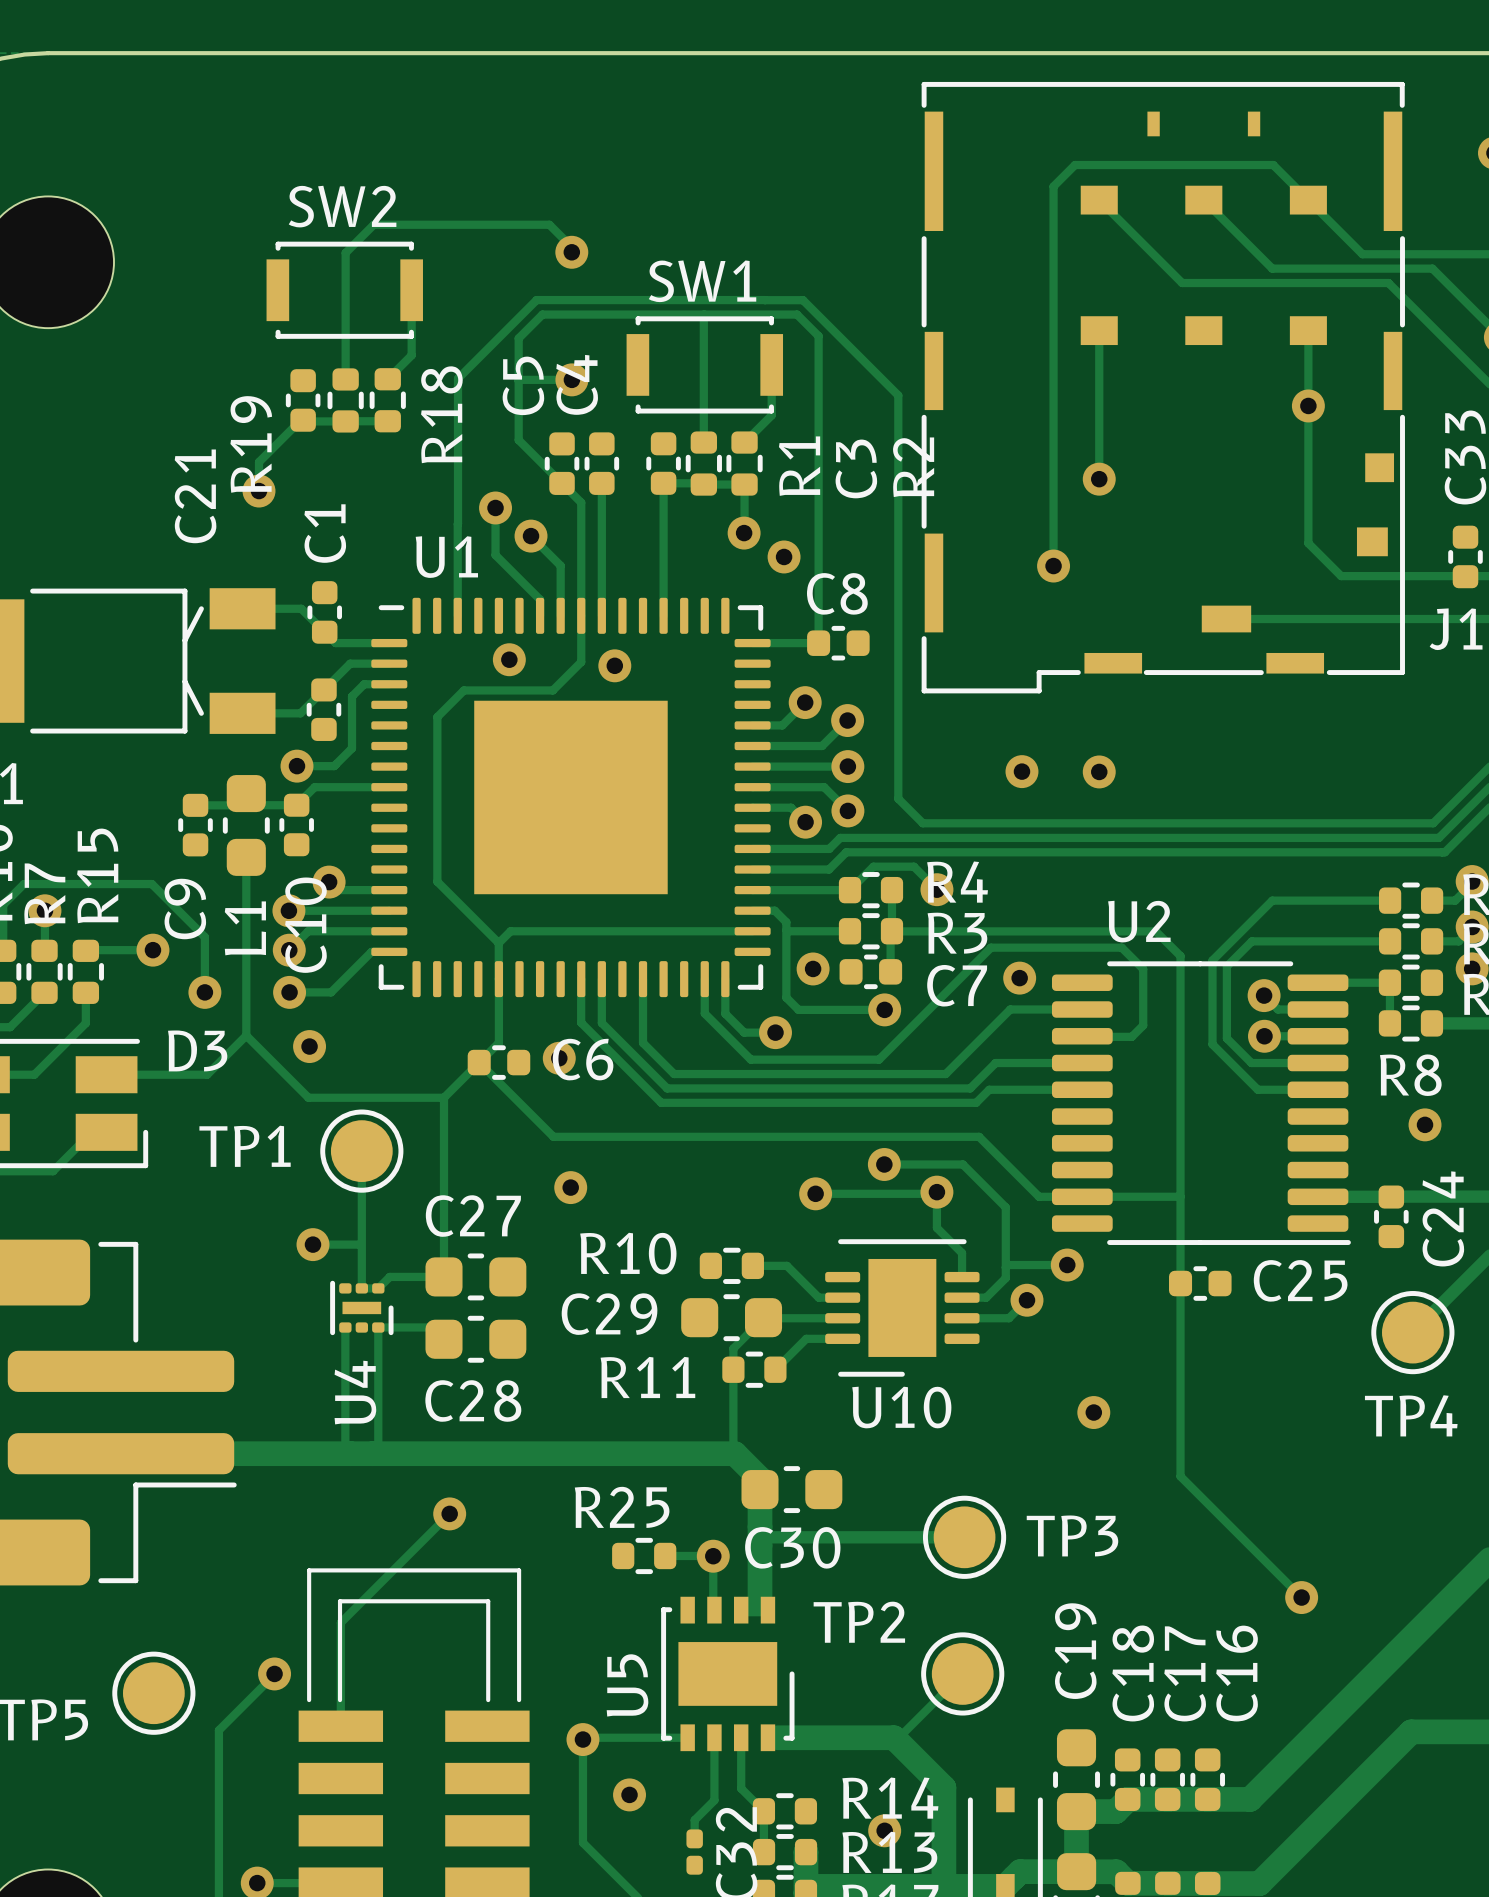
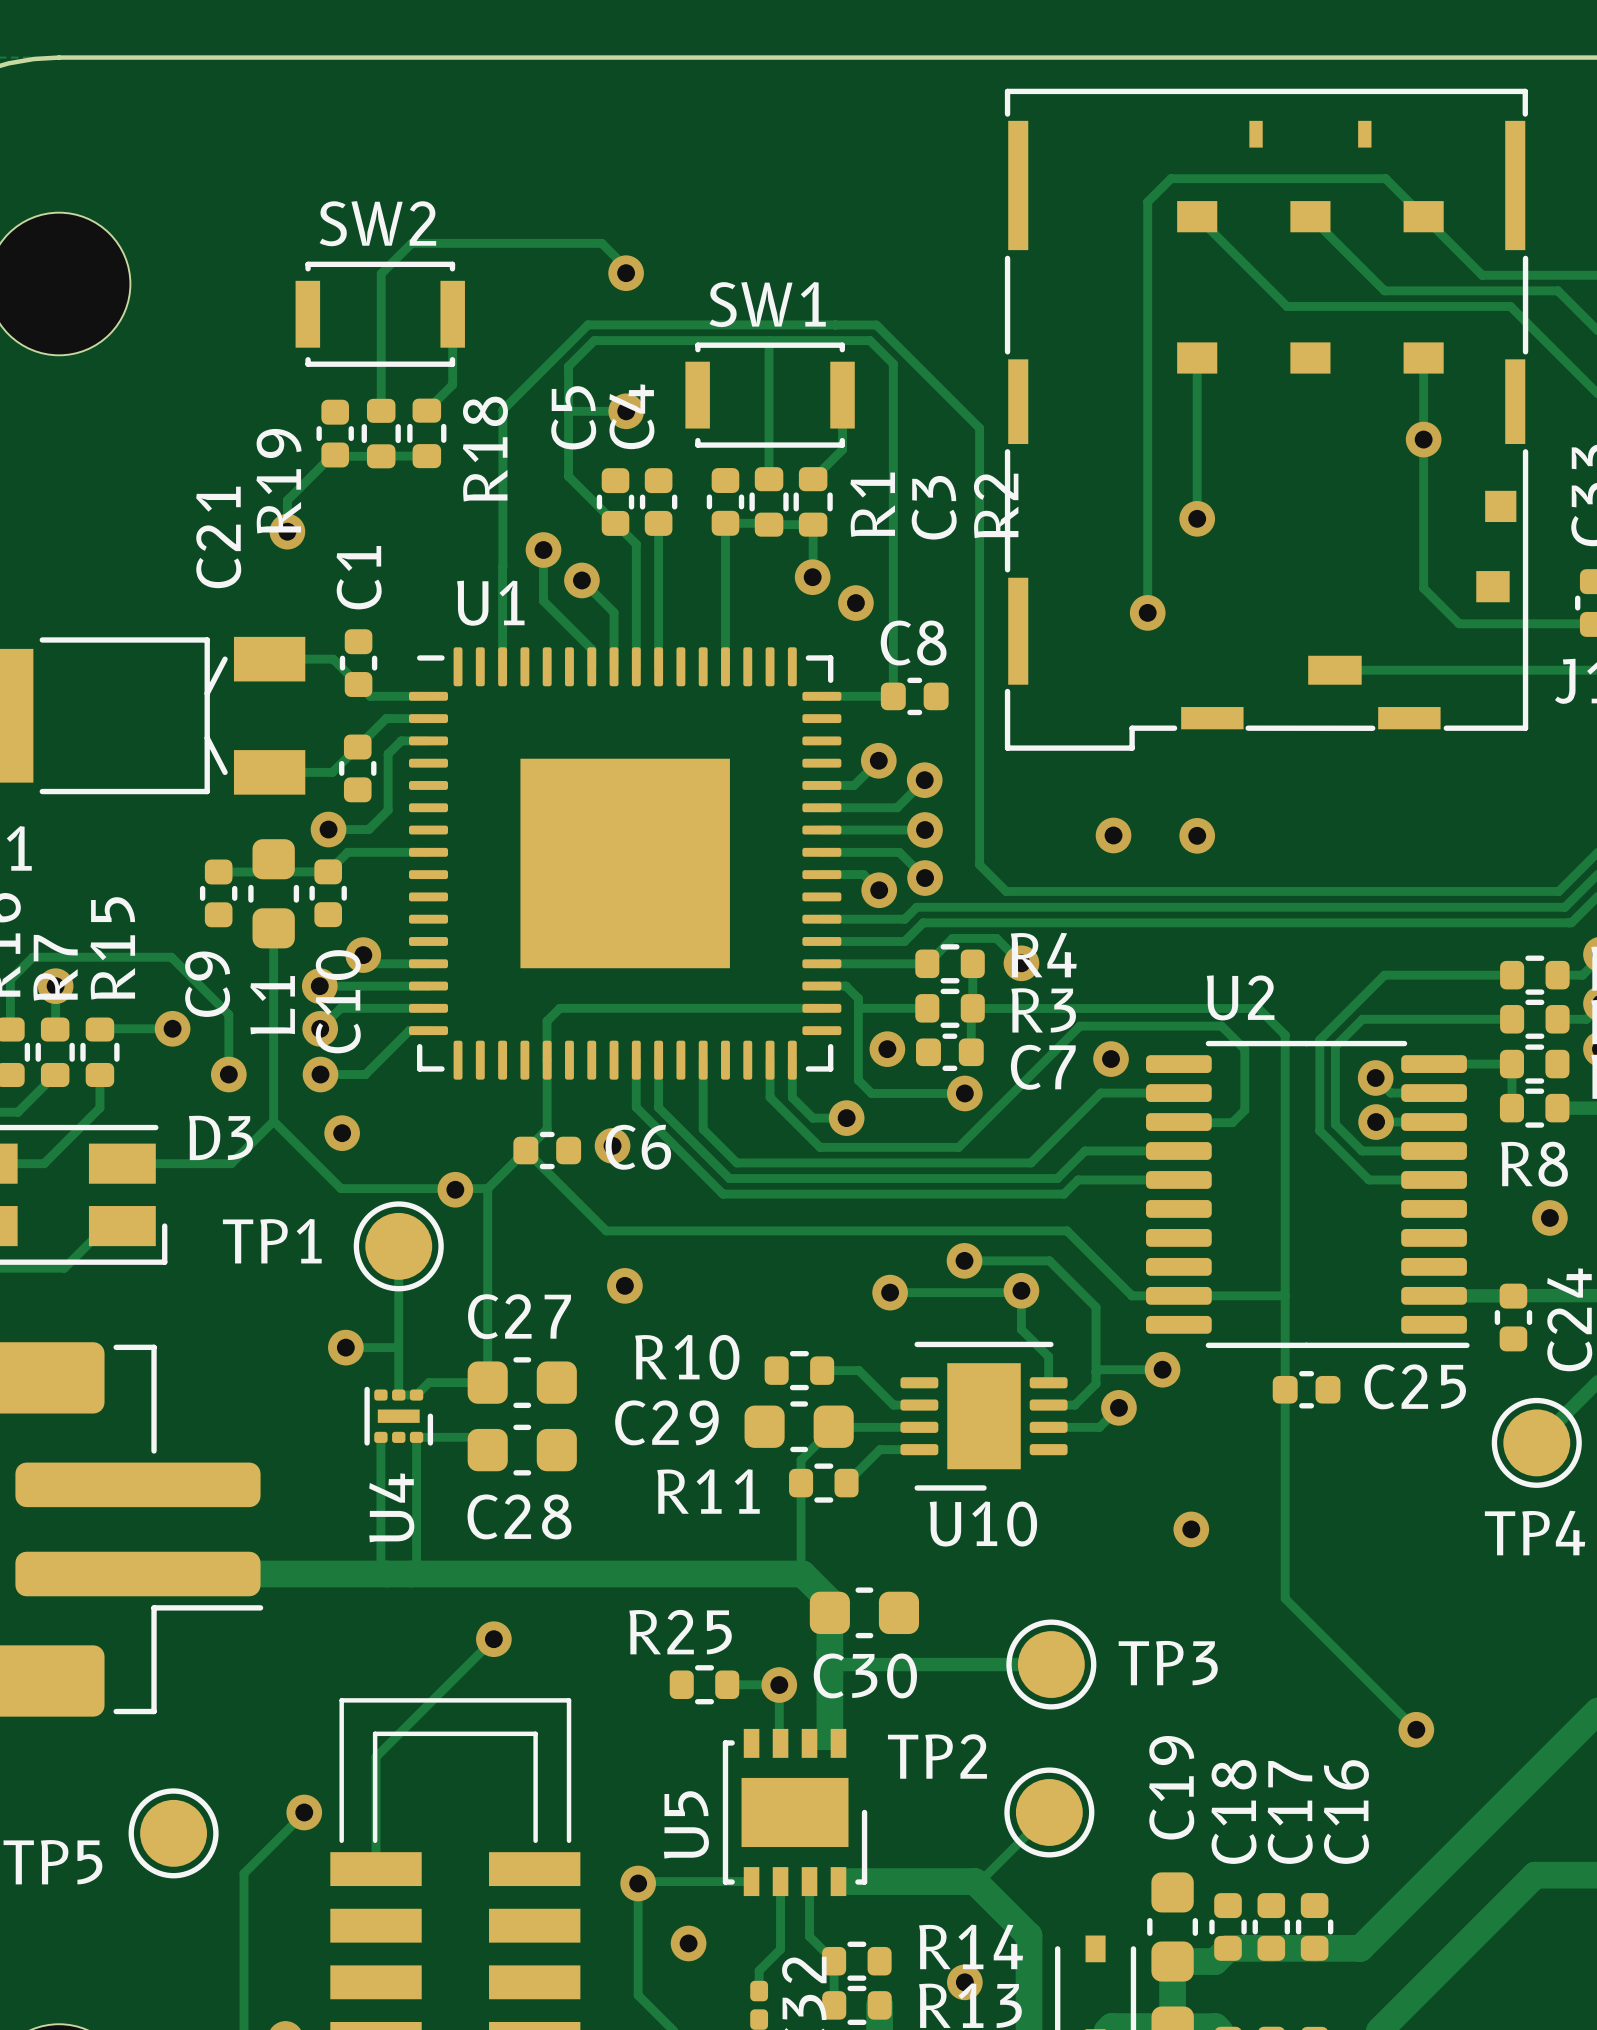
track: (581, 615) (581, 662) (552, 690) (463, 690) (437, 717) (437, 881) (498, 943) -> none
via: (509, 659) -> none
via: (614, 665) -> none
via: none -> (455, 1189)

